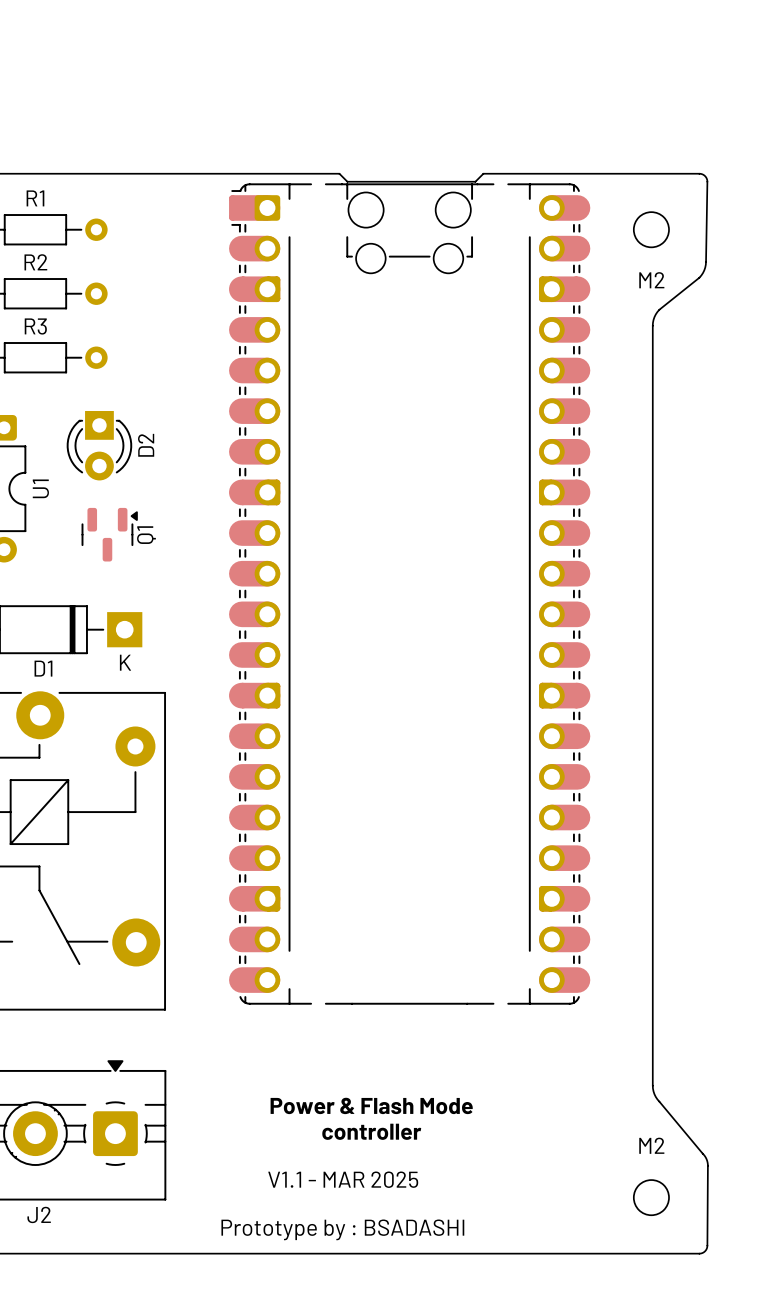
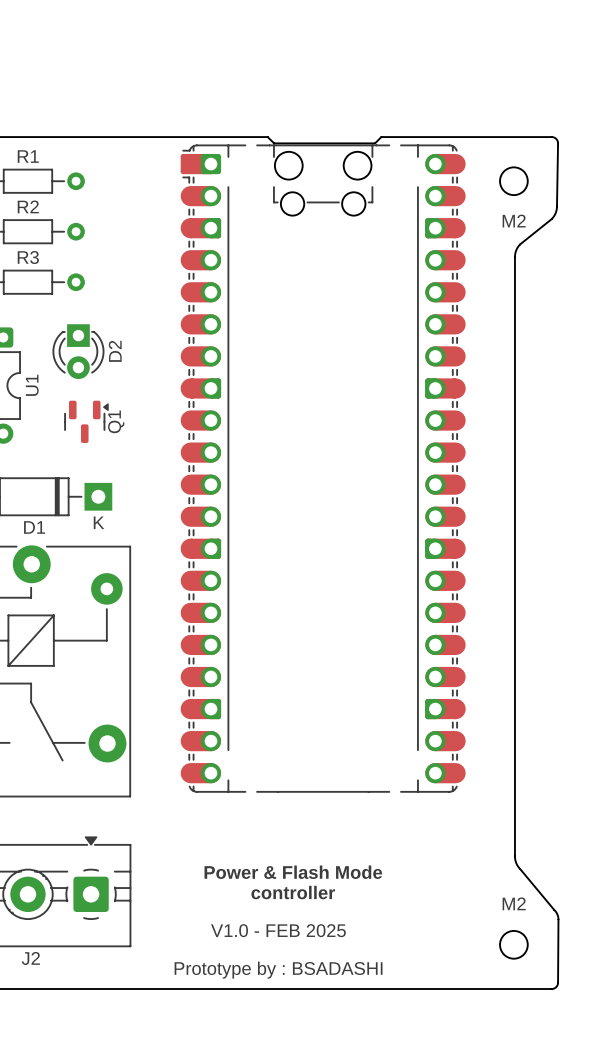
text: V1.1 - MAR 2025 (343, 1179) -> V1.0 - FEB 2025 (278, 930)

